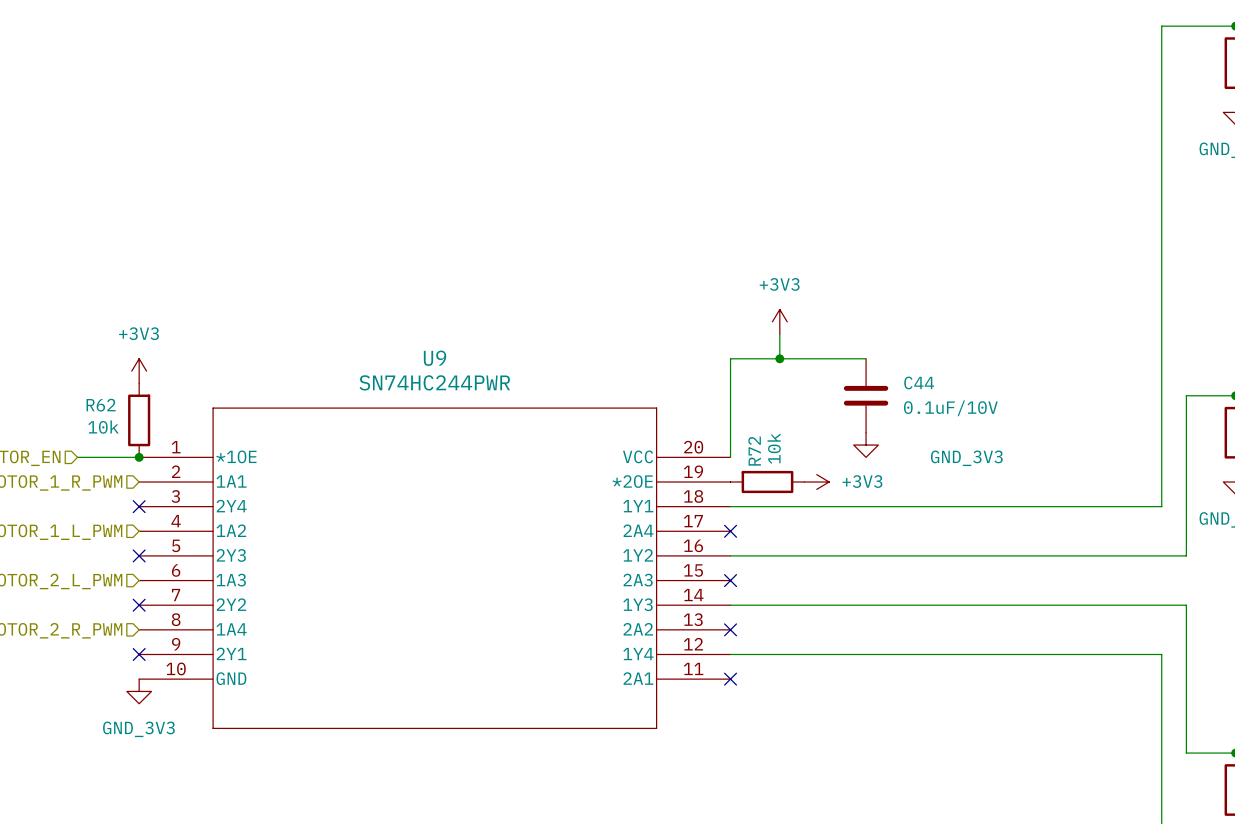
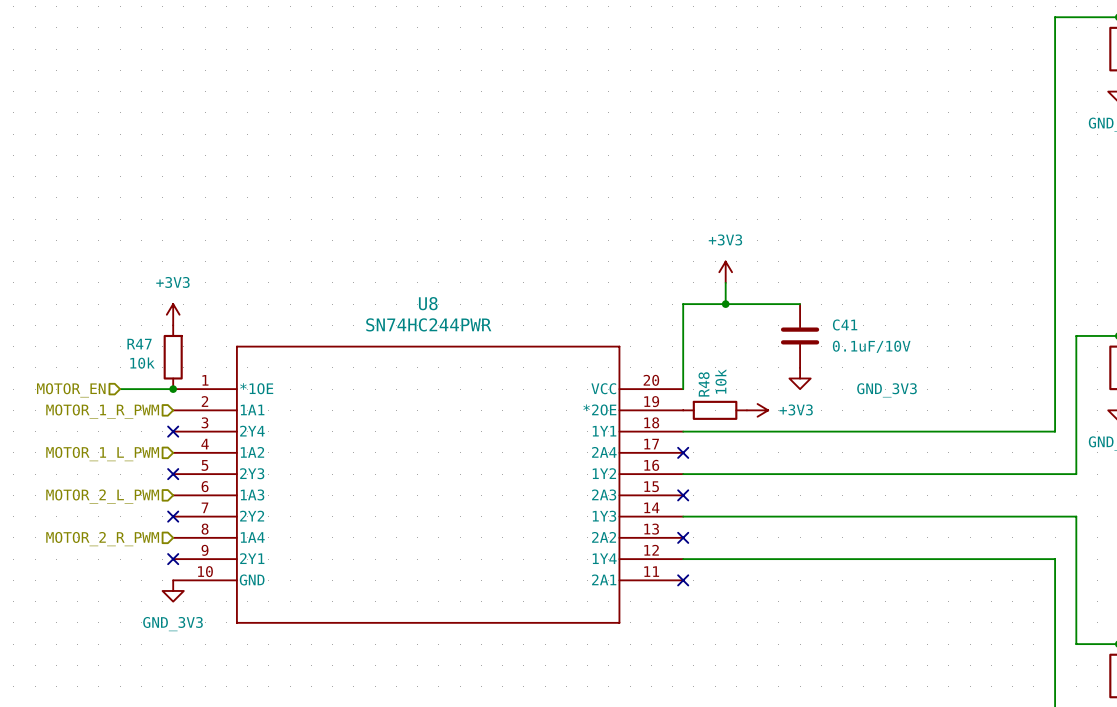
U9 name: U9 (435, 358) -> U8 (428, 303)
C44 name: C44 (919, 382) -> C41 (845, 324)
R62 name: R62 (101, 405) -> R47 (139, 344)
R72 name: R72 (754, 451) -> R48 (704, 384)

